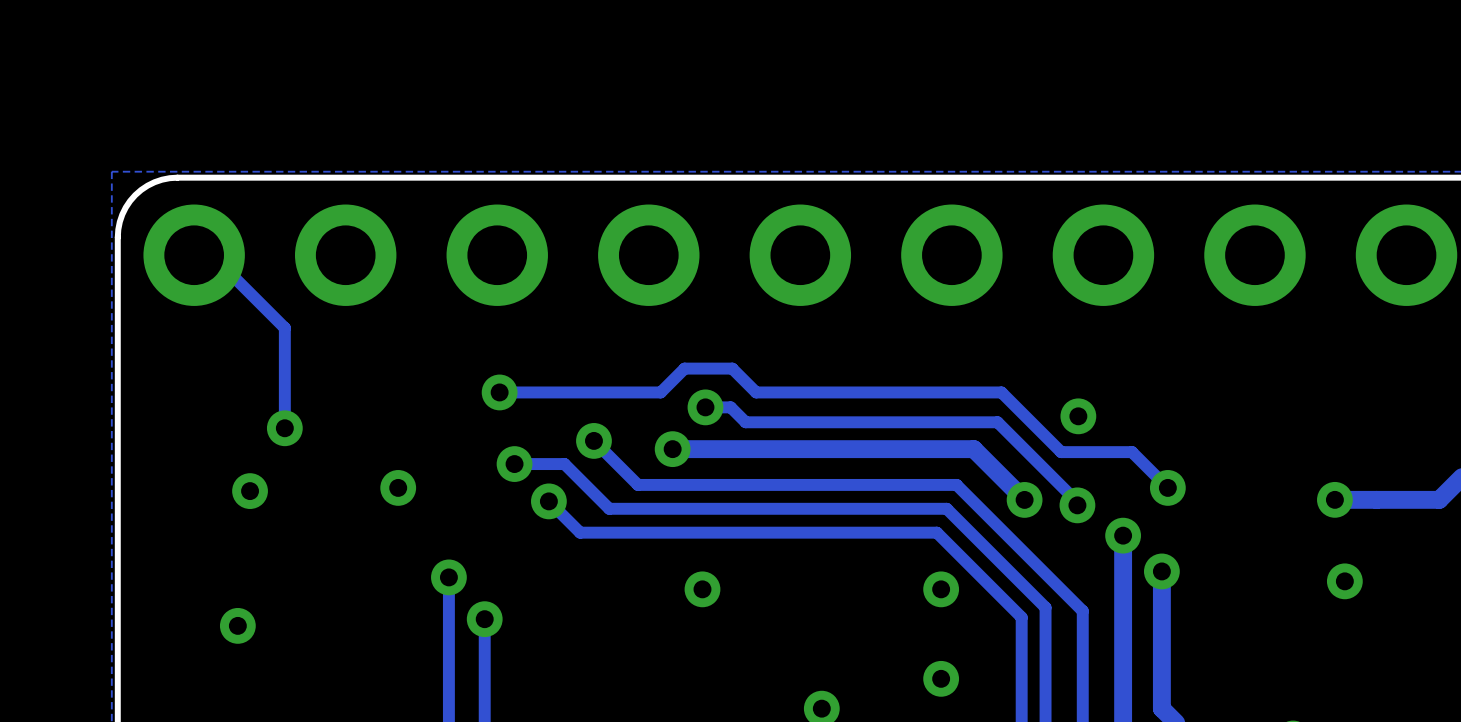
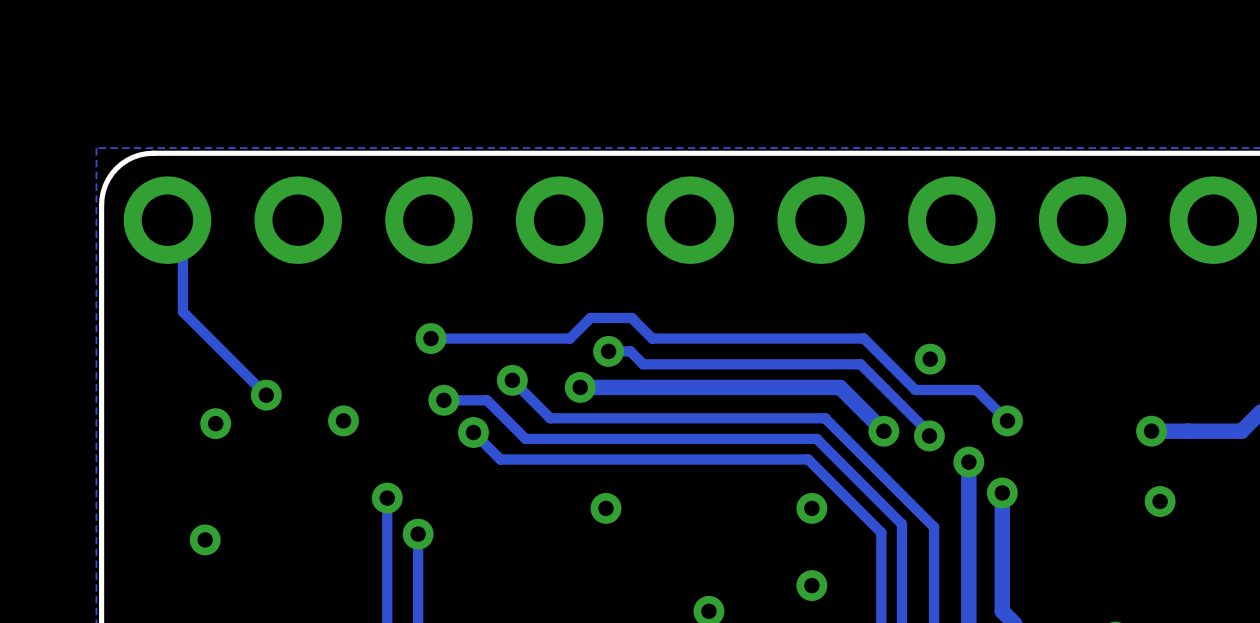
track: (212, 255) (284, 328) (284, 428) -> (182, 220) (182, 311) (266, 395)
via position: (284, 428) -> (266, 395)

